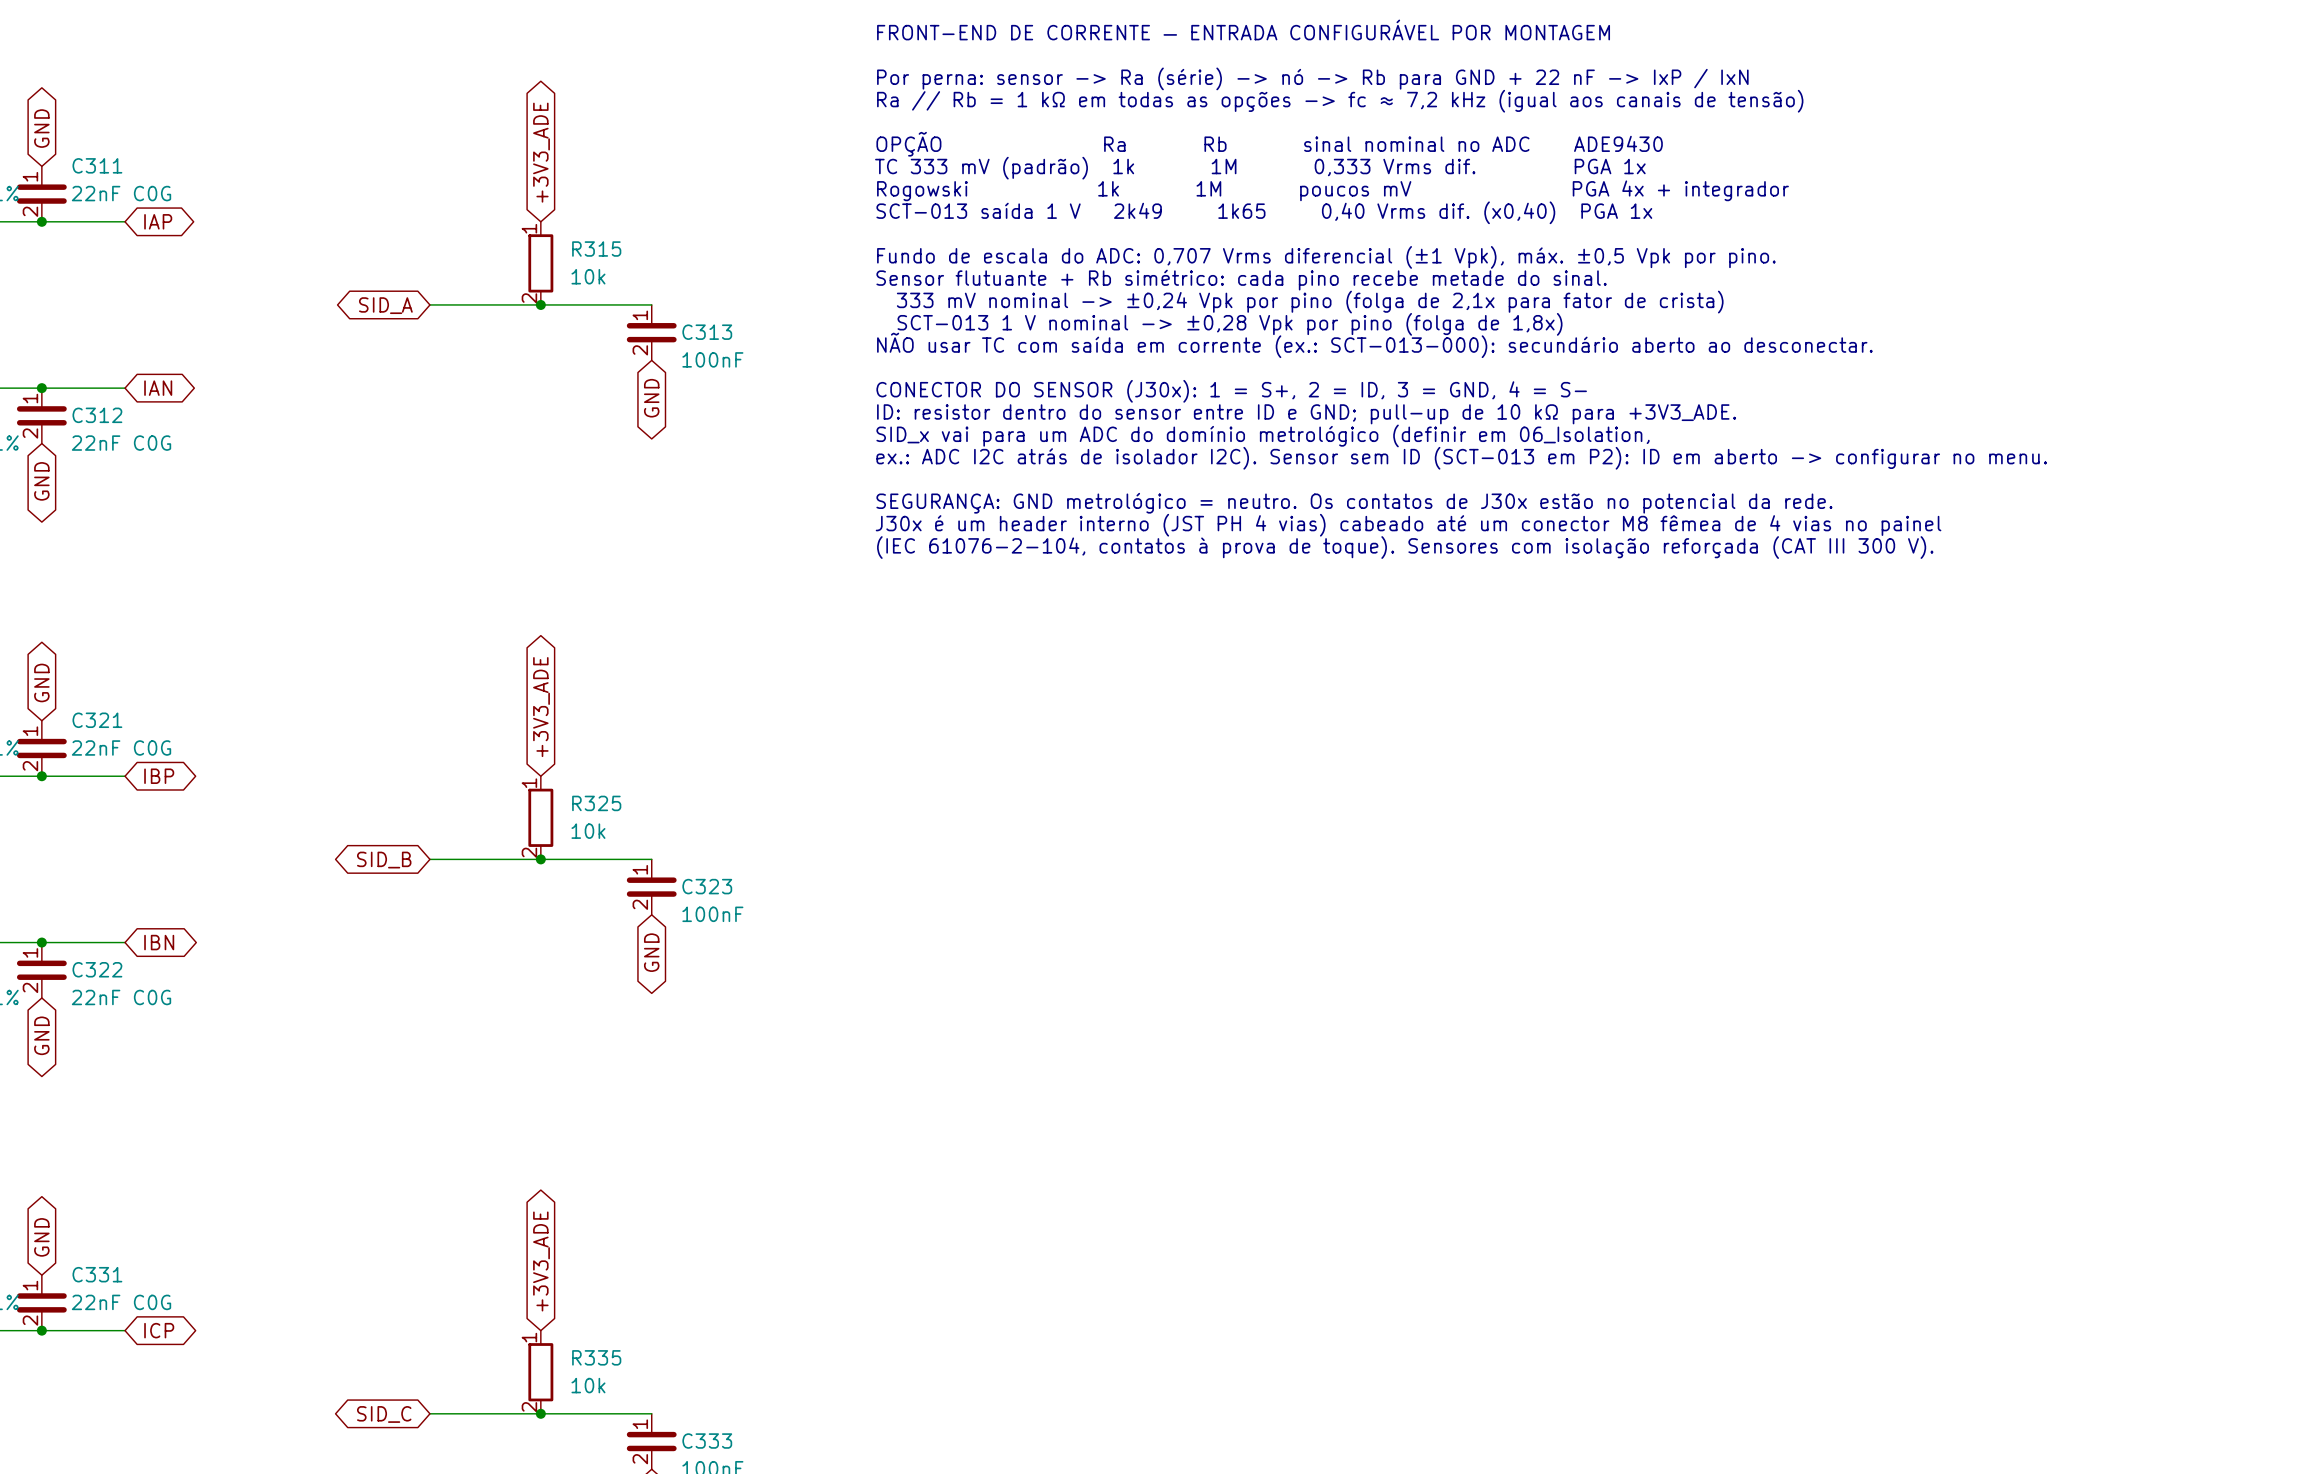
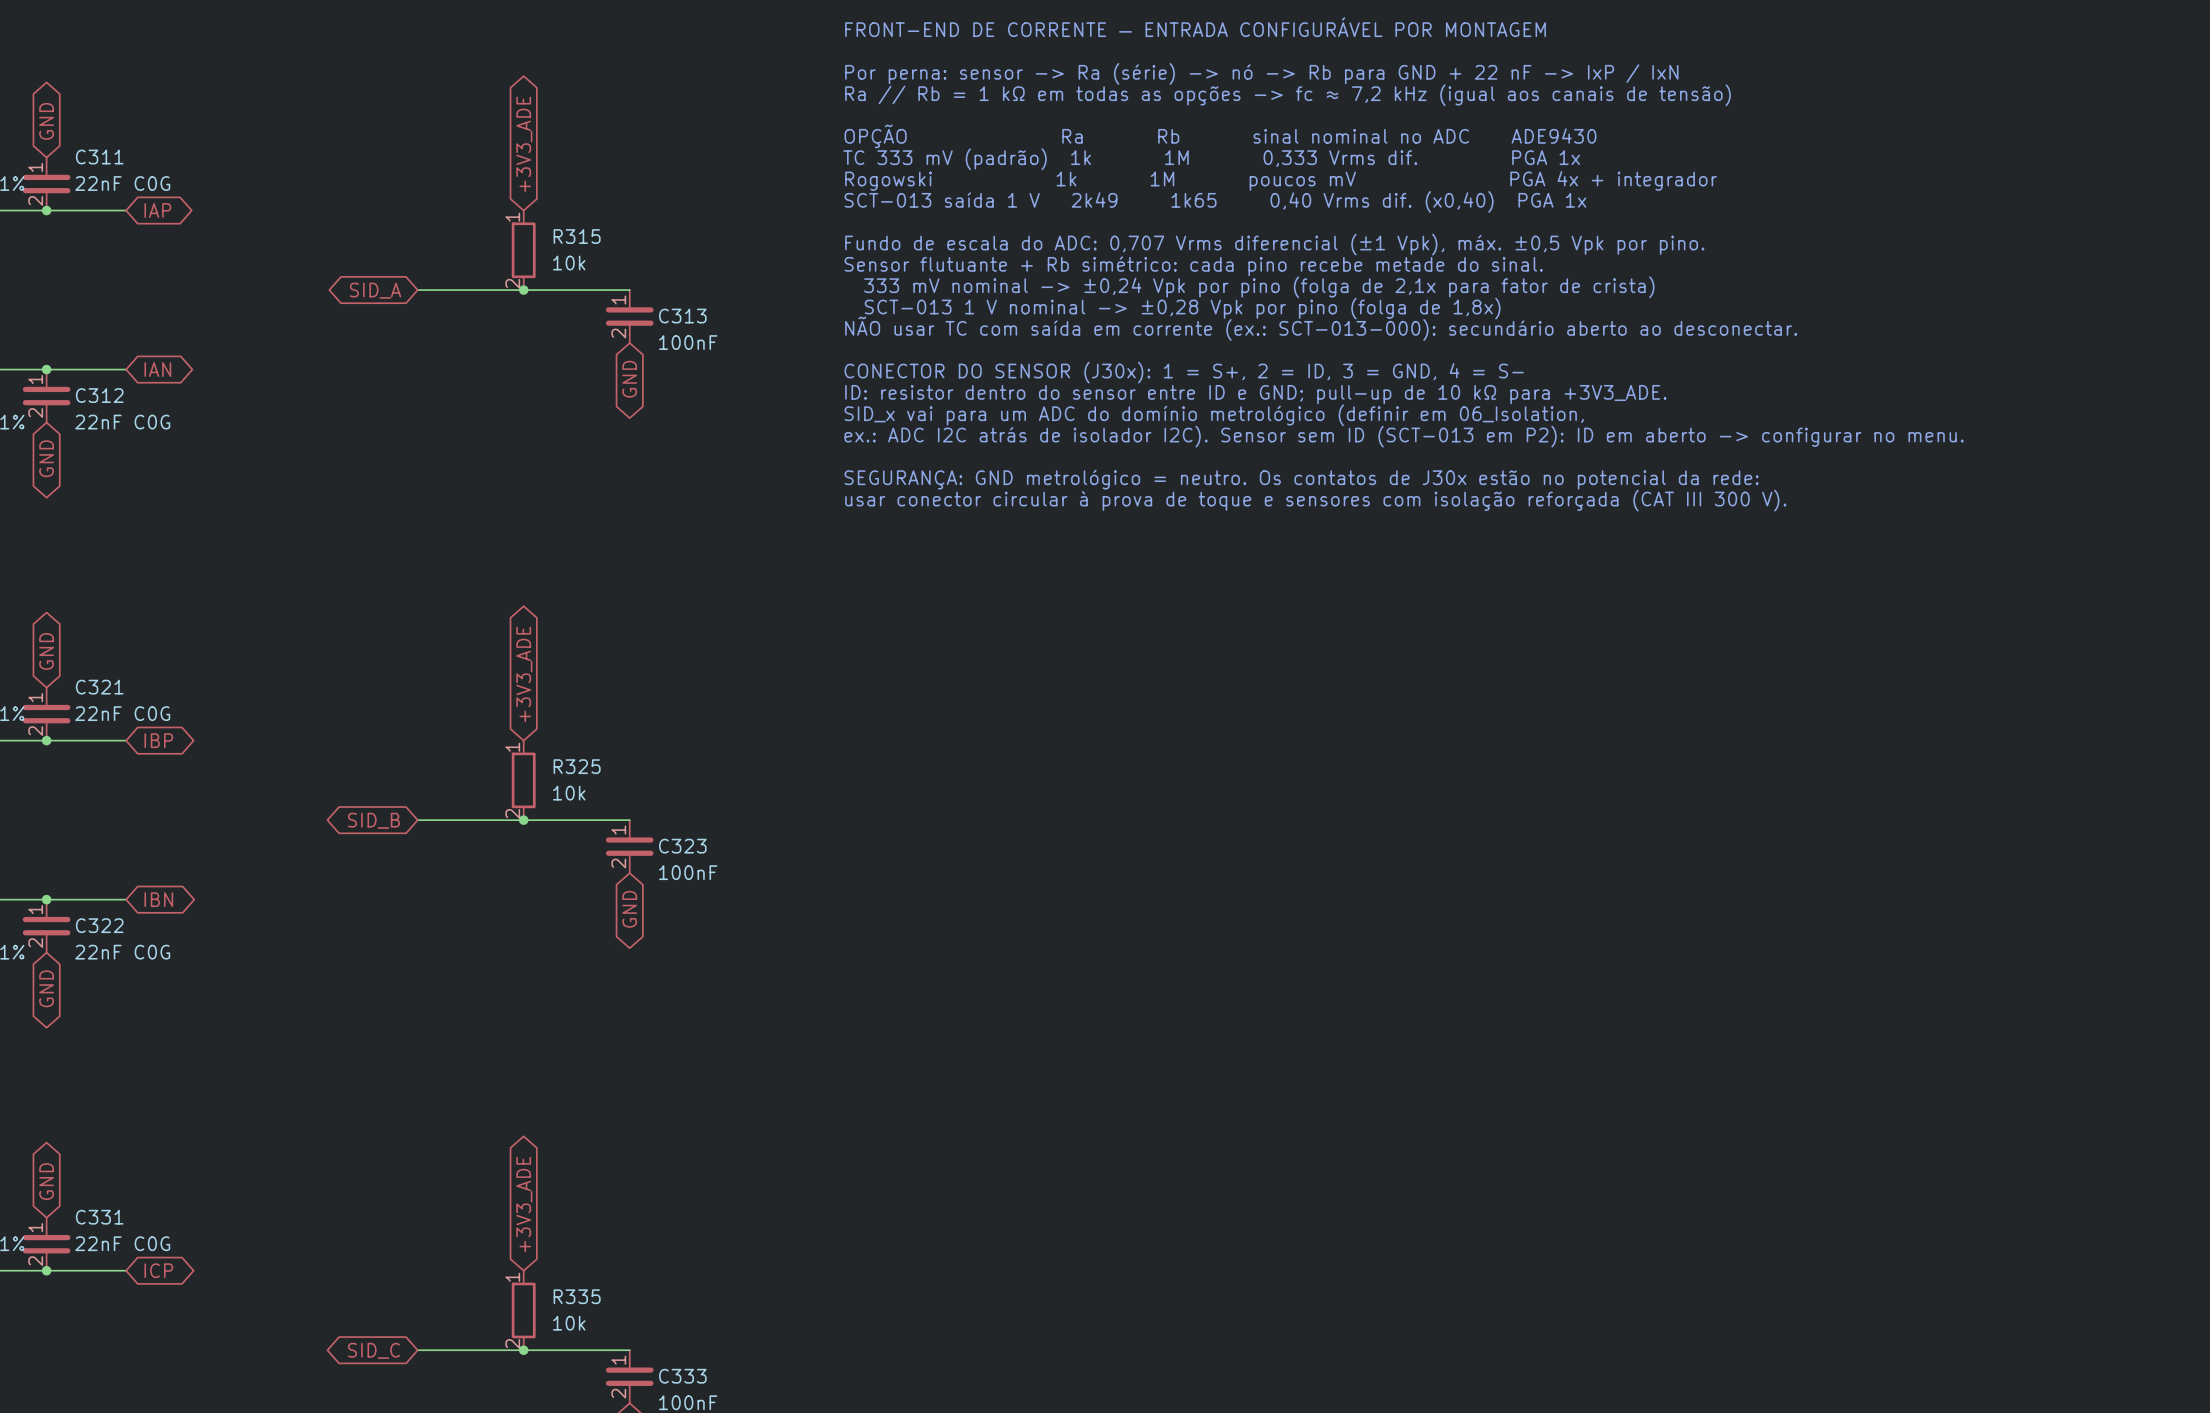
text: SEGURANÇA: GND metrológico = neutro. Os contatos de J30x estão no potencial da rede. (1354, 503) -> SEGURANÇA: GND metrológico = neutro. Os contatos de J30x estão no potencial da rede: (1301, 479)
text: J30x é um header interno (JST PH 4 vias) cabeado até um conector M8 fêmea de 4 vias no painel (1408, 525) -> usar conector circular à prova de toque e sensores com isolação reforçada (CAT III 300 V). (1315, 500)
text: (IEC 61076-2-104, contatos à prova de toque). Sensores com isolação reforçada (CAT III 300 V). (1405, 547) -> none

